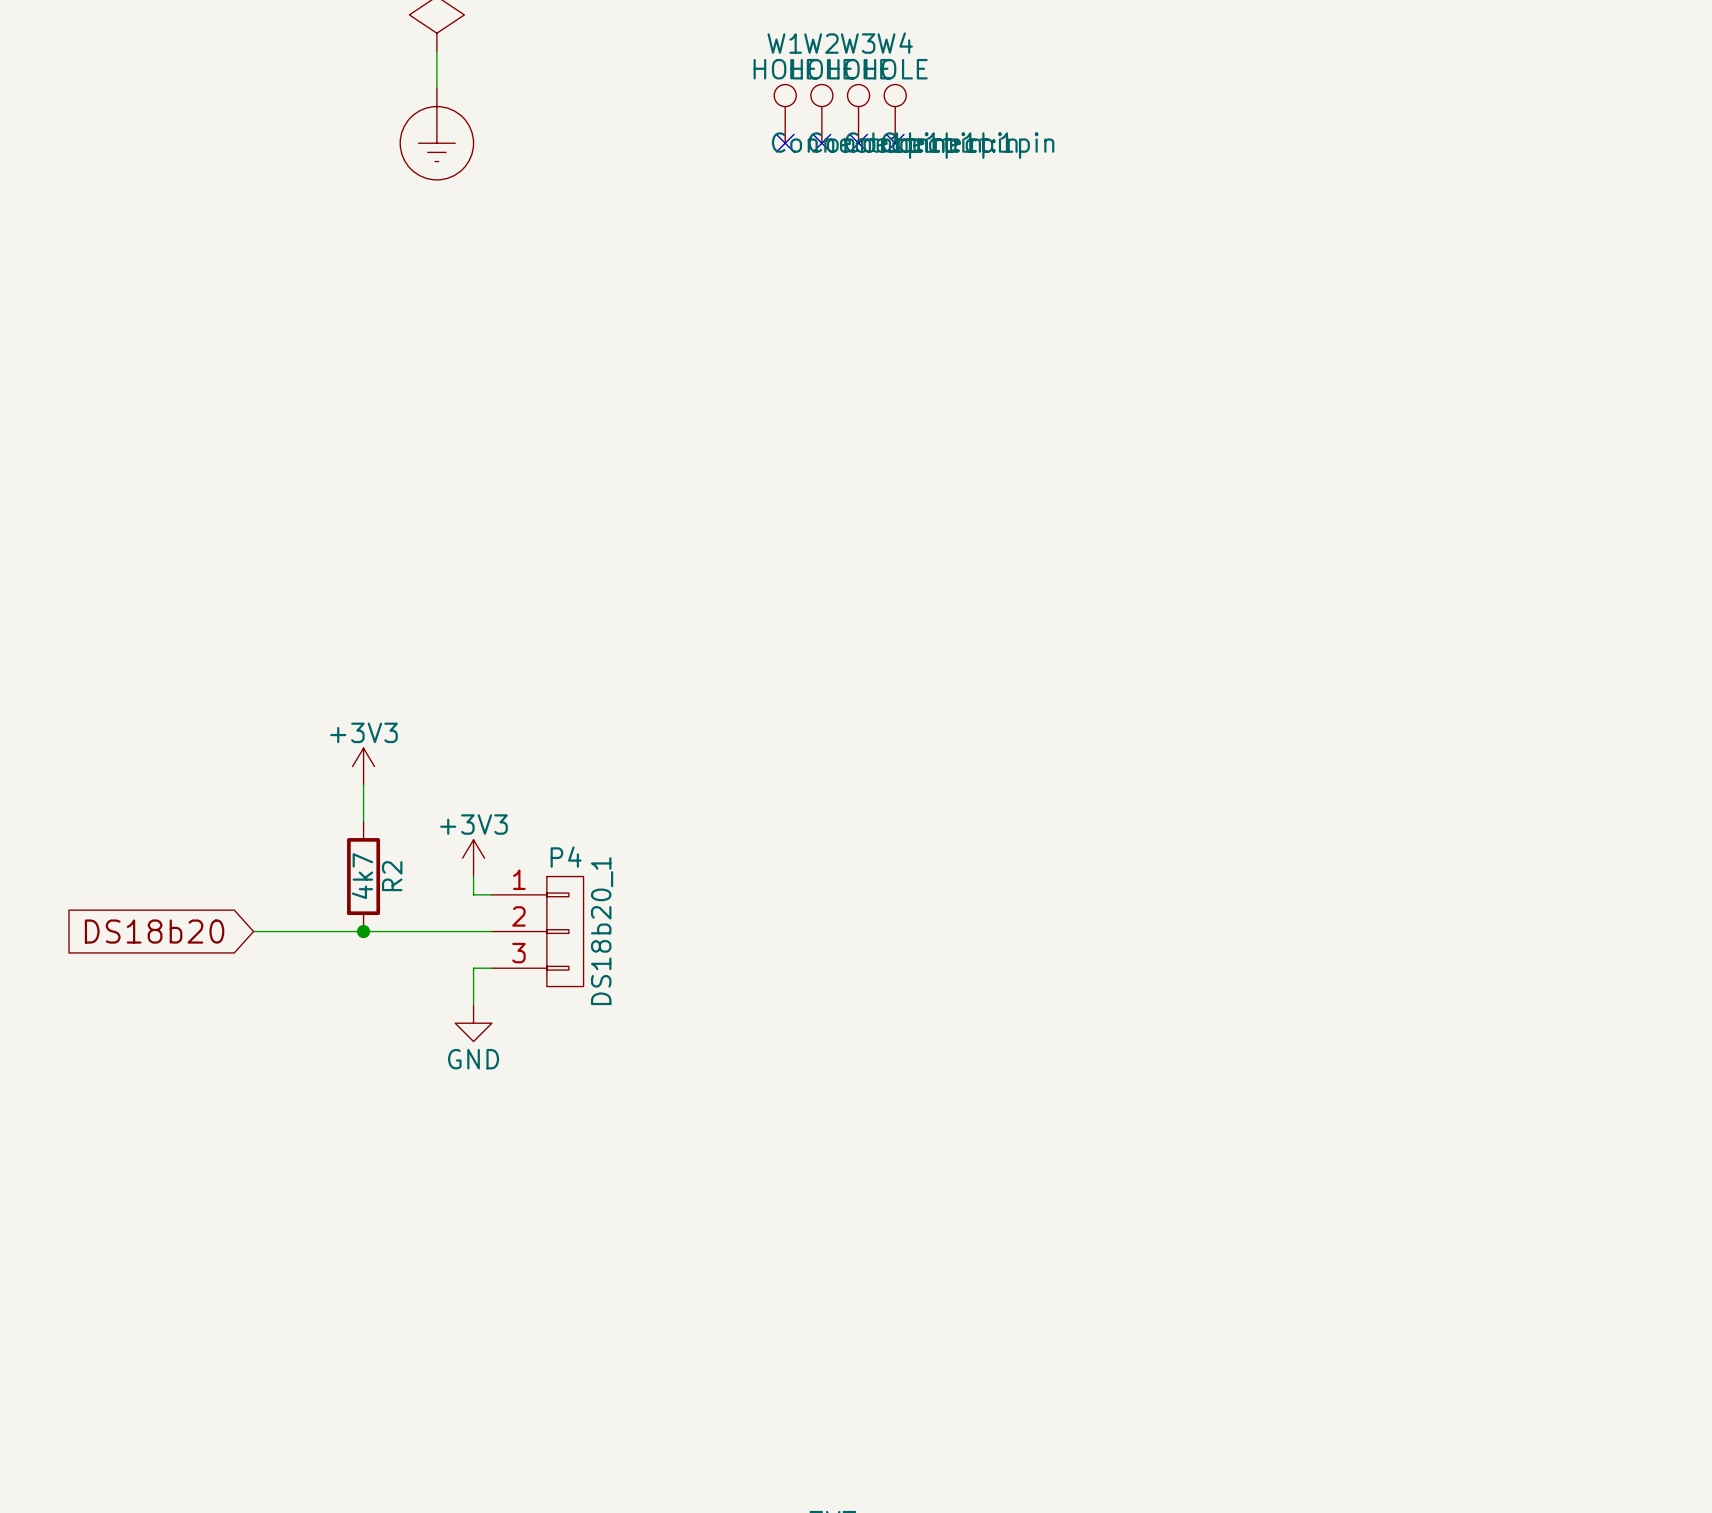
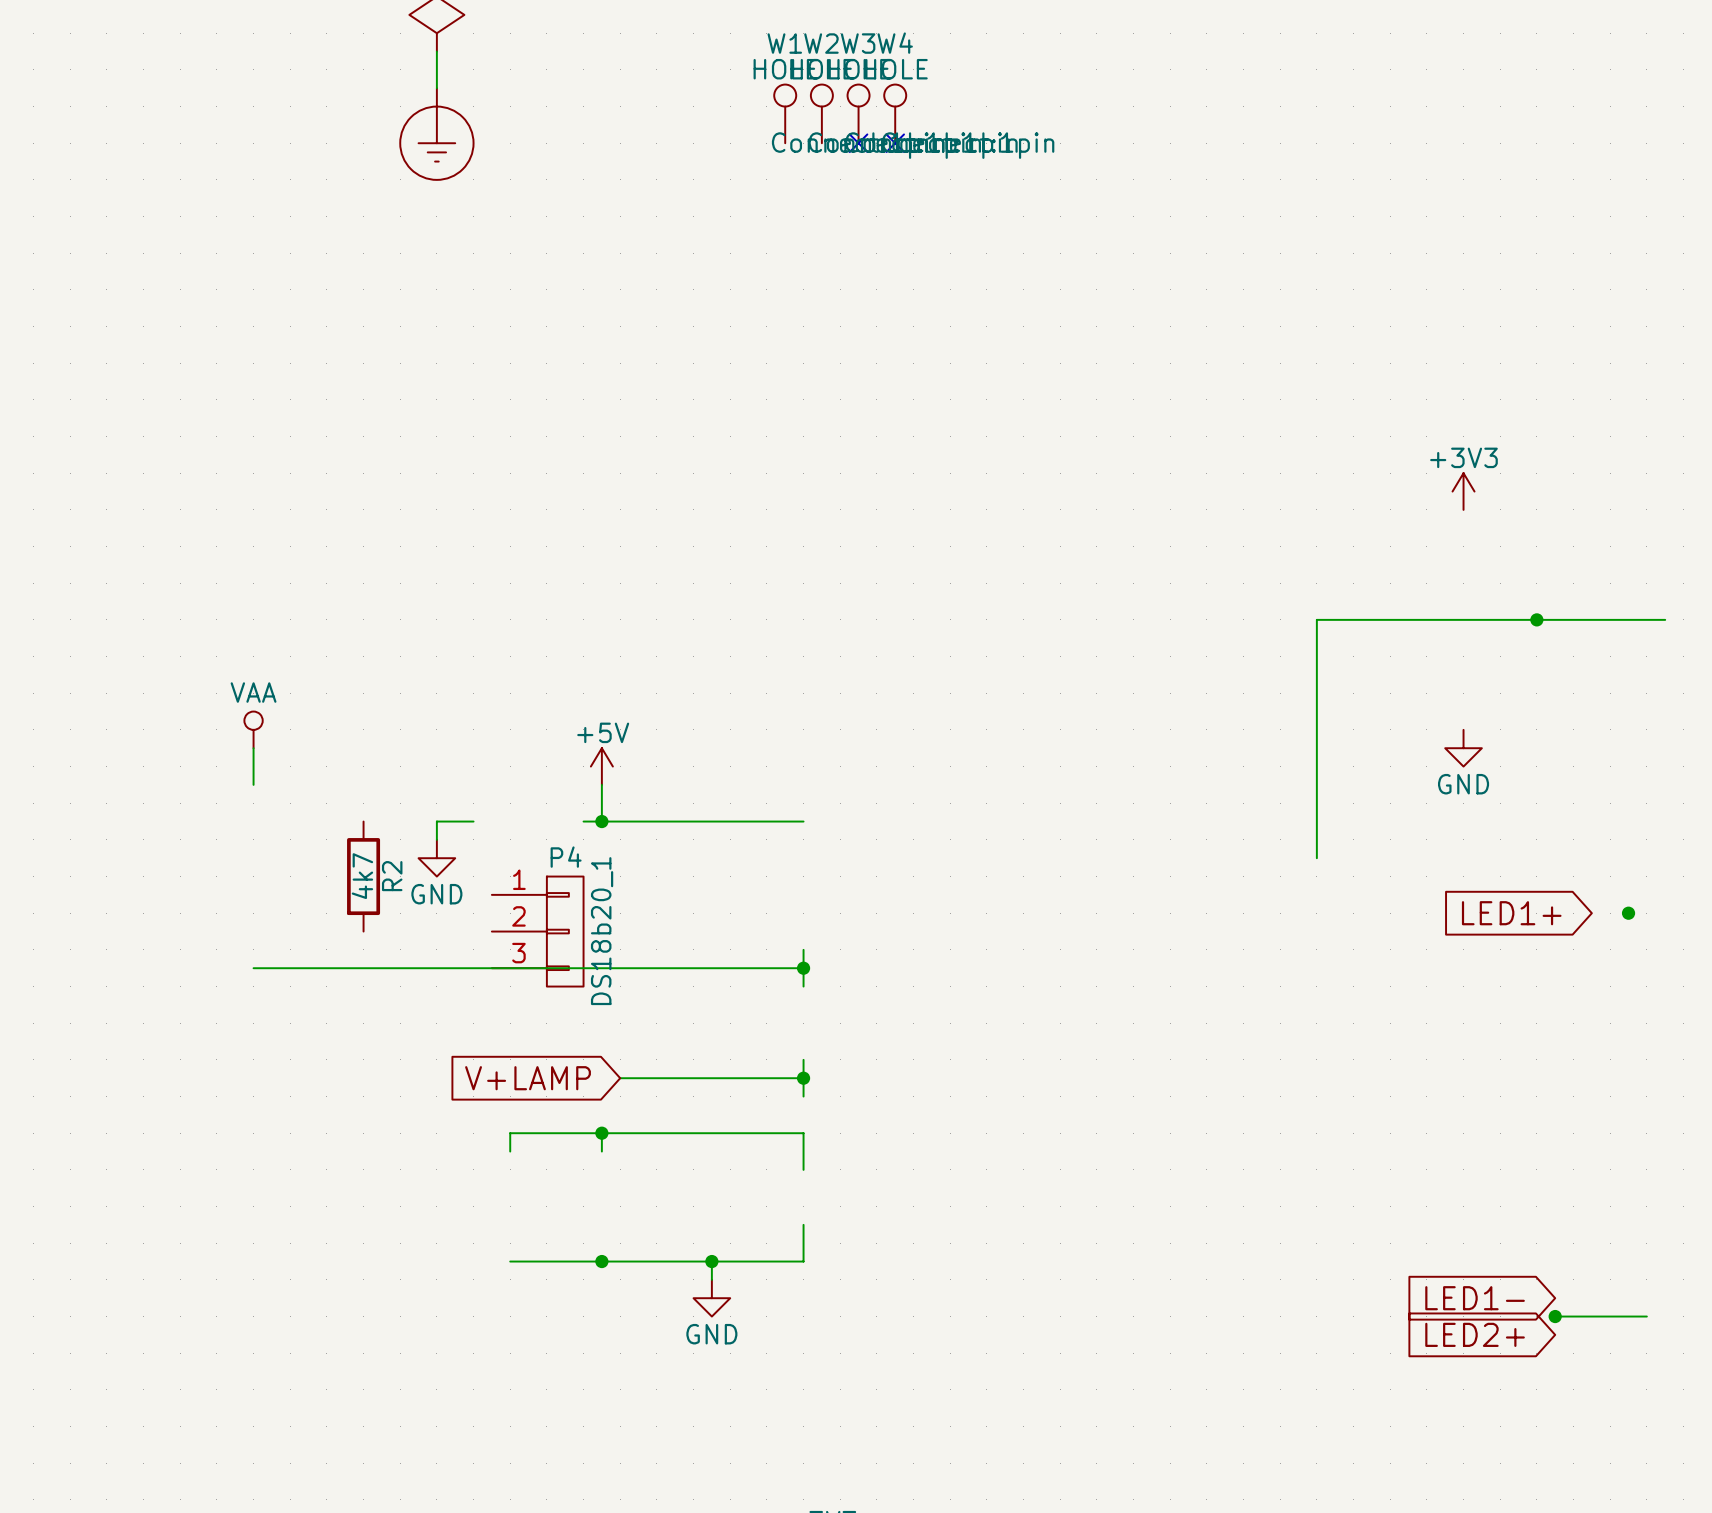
no-connect mark: (785, 143) -> none
no-connect mark: (821, 143) -> none
power symbol: none -> +3V3 (1463, 491)
junction: none -> (1536, 619)
wire: none -> (1665, 619) (1316, 619) (1316, 858)
power symbol: none -> VAA (253, 729)
power symbol: none -> GND (1463, 748)
power symbol: +3V3 (363, 766) -> none
power symbol: none -> +5V (601, 766)
wire: (363, 784) (363, 821) -> (253, 748) (253, 784)
wire: none -> (601, 784) (601, 821)
wire: none -> (473, 821) (436, 821) (436, 839)
wire: none -> (583, 821) (803, 821)
junction: none -> (601, 821)
power symbol: +3V3 (473, 858) -> none
wire: (473, 876) (473, 894) (491, 894) -> none
global label: none -> LED1+ (1511, 913)
junction: none -> (1628, 913)
global label: DS18b20 (154, 931) -> none
wire: (253, 931) (491, 931) -> none
junction: (363, 931) -> none
wire: none -> (803, 949) (803, 986)
wire: (473, 968) (473, 1004) -> (473, 968) (253, 968)
wire: none -> (491, 968) (803, 968)
junction: none -> (803, 968)
power symbol position: GND (473, 1023) -> GND (436, 858)
wire: none -> (803, 1059) (803, 1096)
global label: none -> V+LAMP (528, 1078)
wire: none -> (620, 1078) (803, 1078)
junction: none -> (803, 1078)
wire: none -> (601, 1133) (601, 1151)
junction: none -> (601, 1133)
wire: none -> (510, 1151) (510, 1133) (803, 1133) (803, 1169)
wire: none -> (803, 1224) (803, 1261) (510, 1261)
junction: none -> (601, 1261)
wire: none -> (711, 1261) (711, 1279)
junction: none -> (711, 1261)
power symbol: none -> GND (711, 1298)
global label: none -> LED1- (1475, 1298)
wire: none -> (1555, 1316) (1646, 1316)
junction: none -> (1555, 1316)
global label: none -> LED2+ (1475, 1334)

